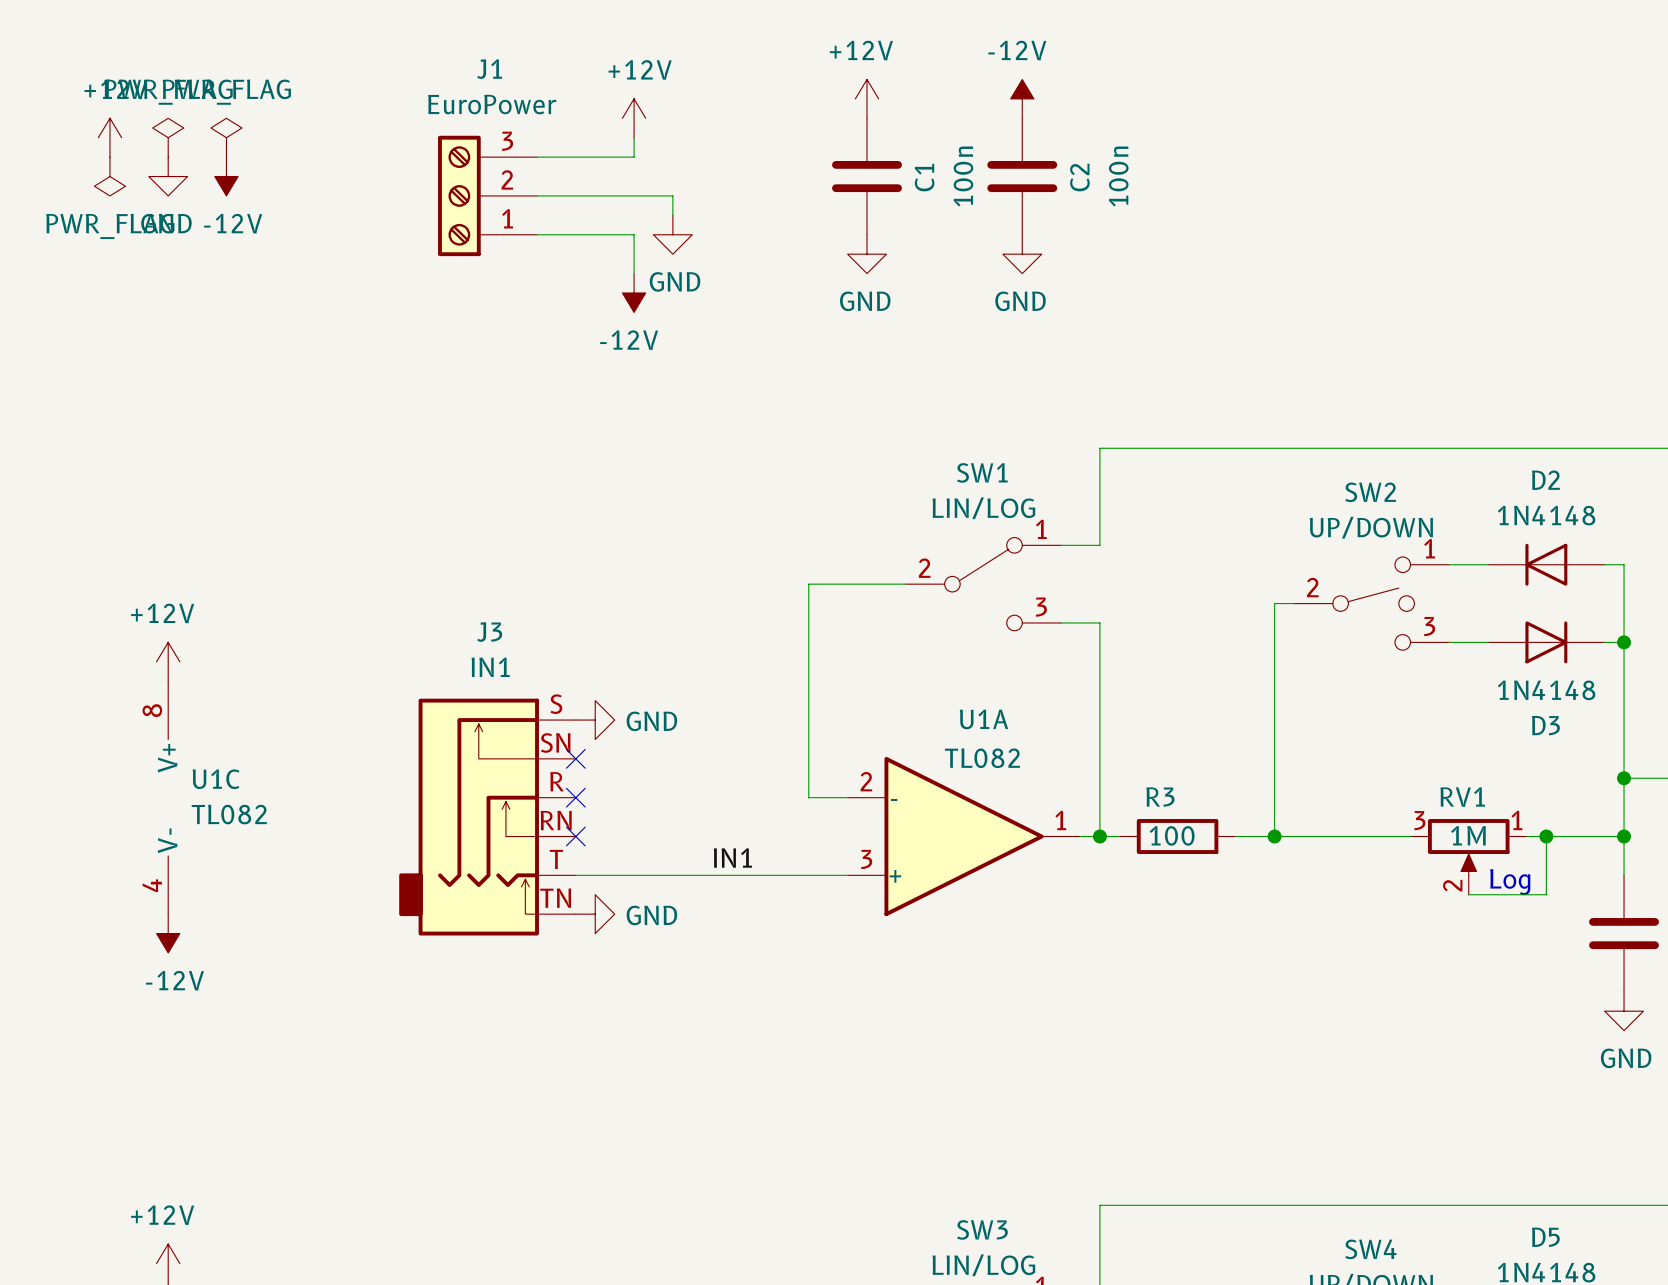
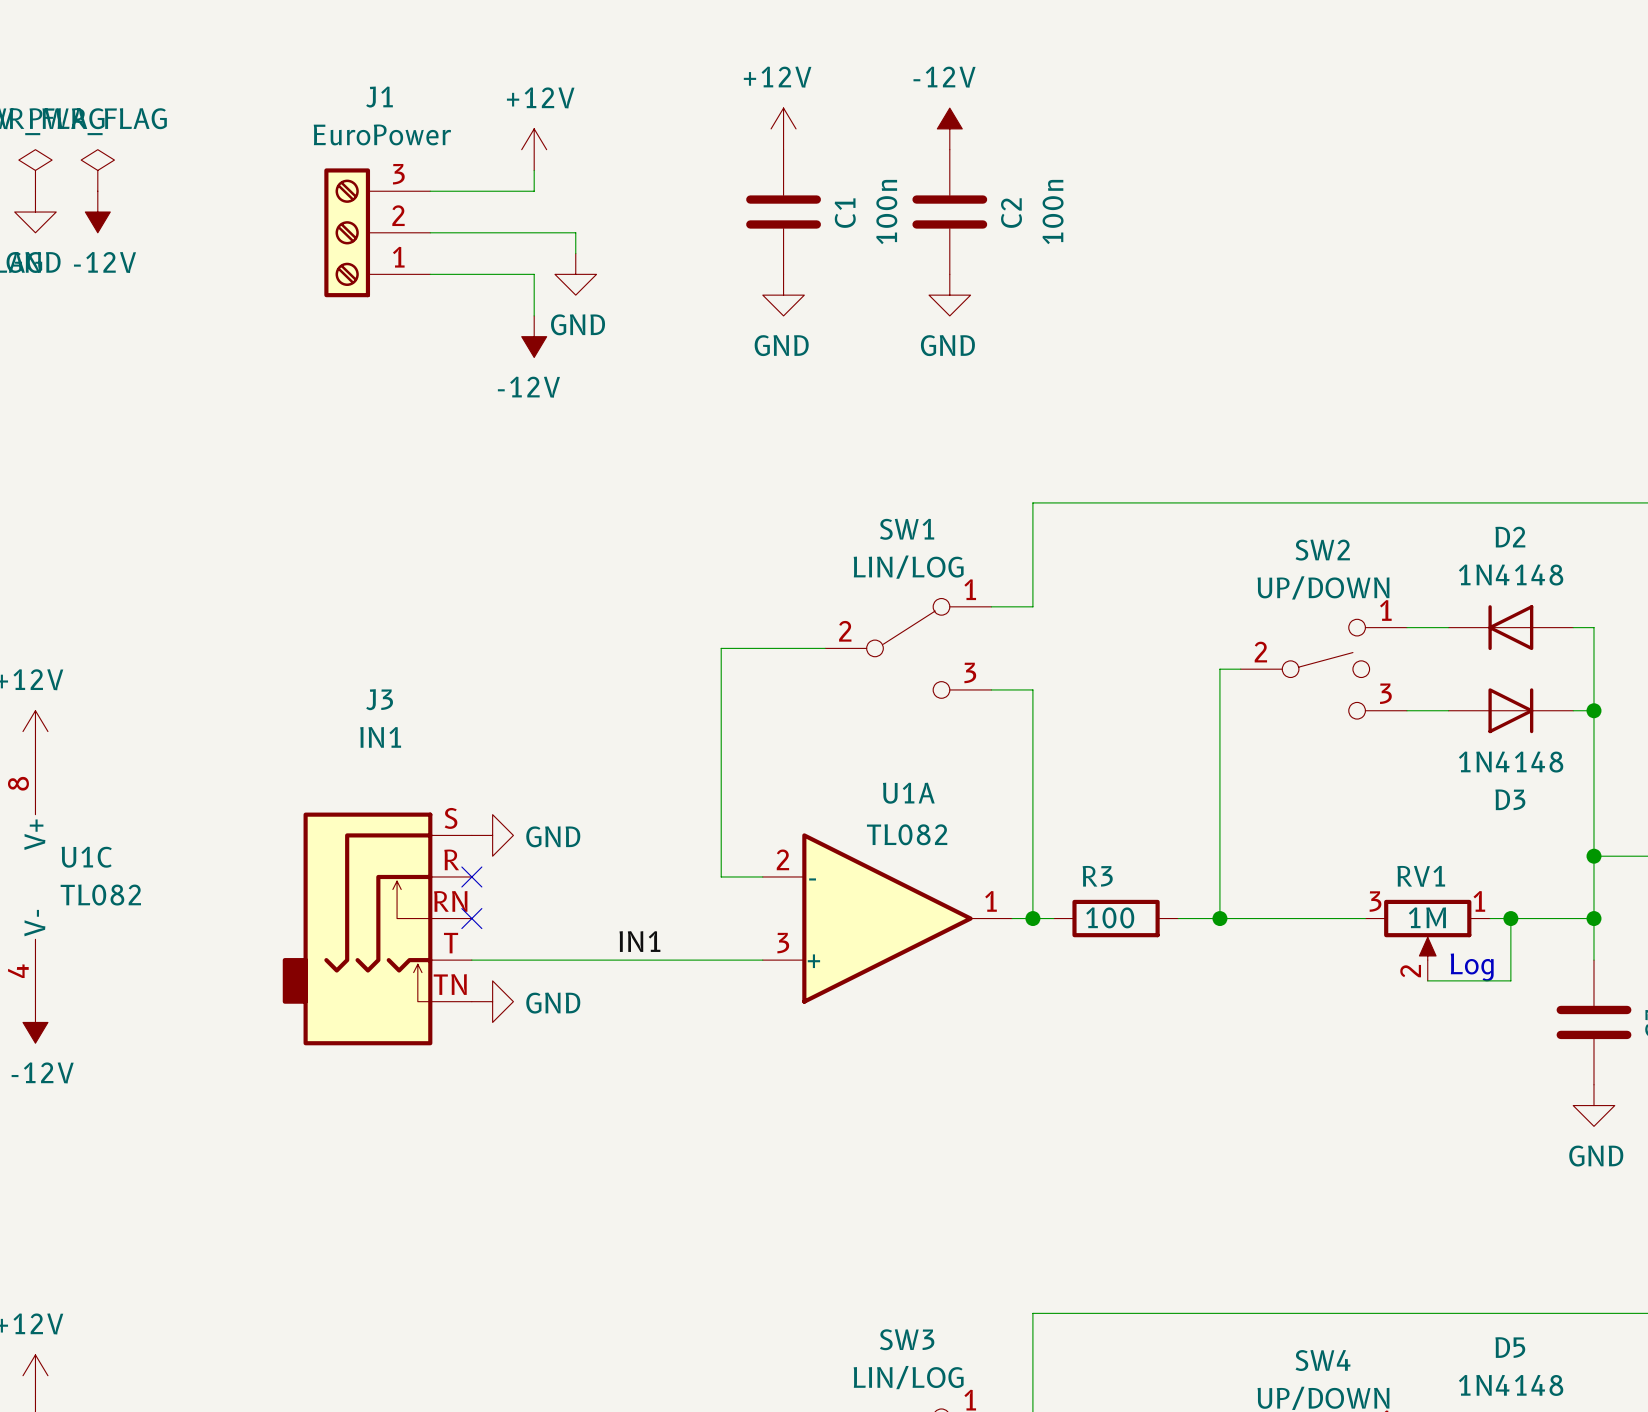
J3 symbol: [399, 698, 576, 936] -> [282, 812, 472, 1046]
power symbol position: GND (595, 720) -> GND (492, 835)
no-connect mark: (575, 758) -> none

